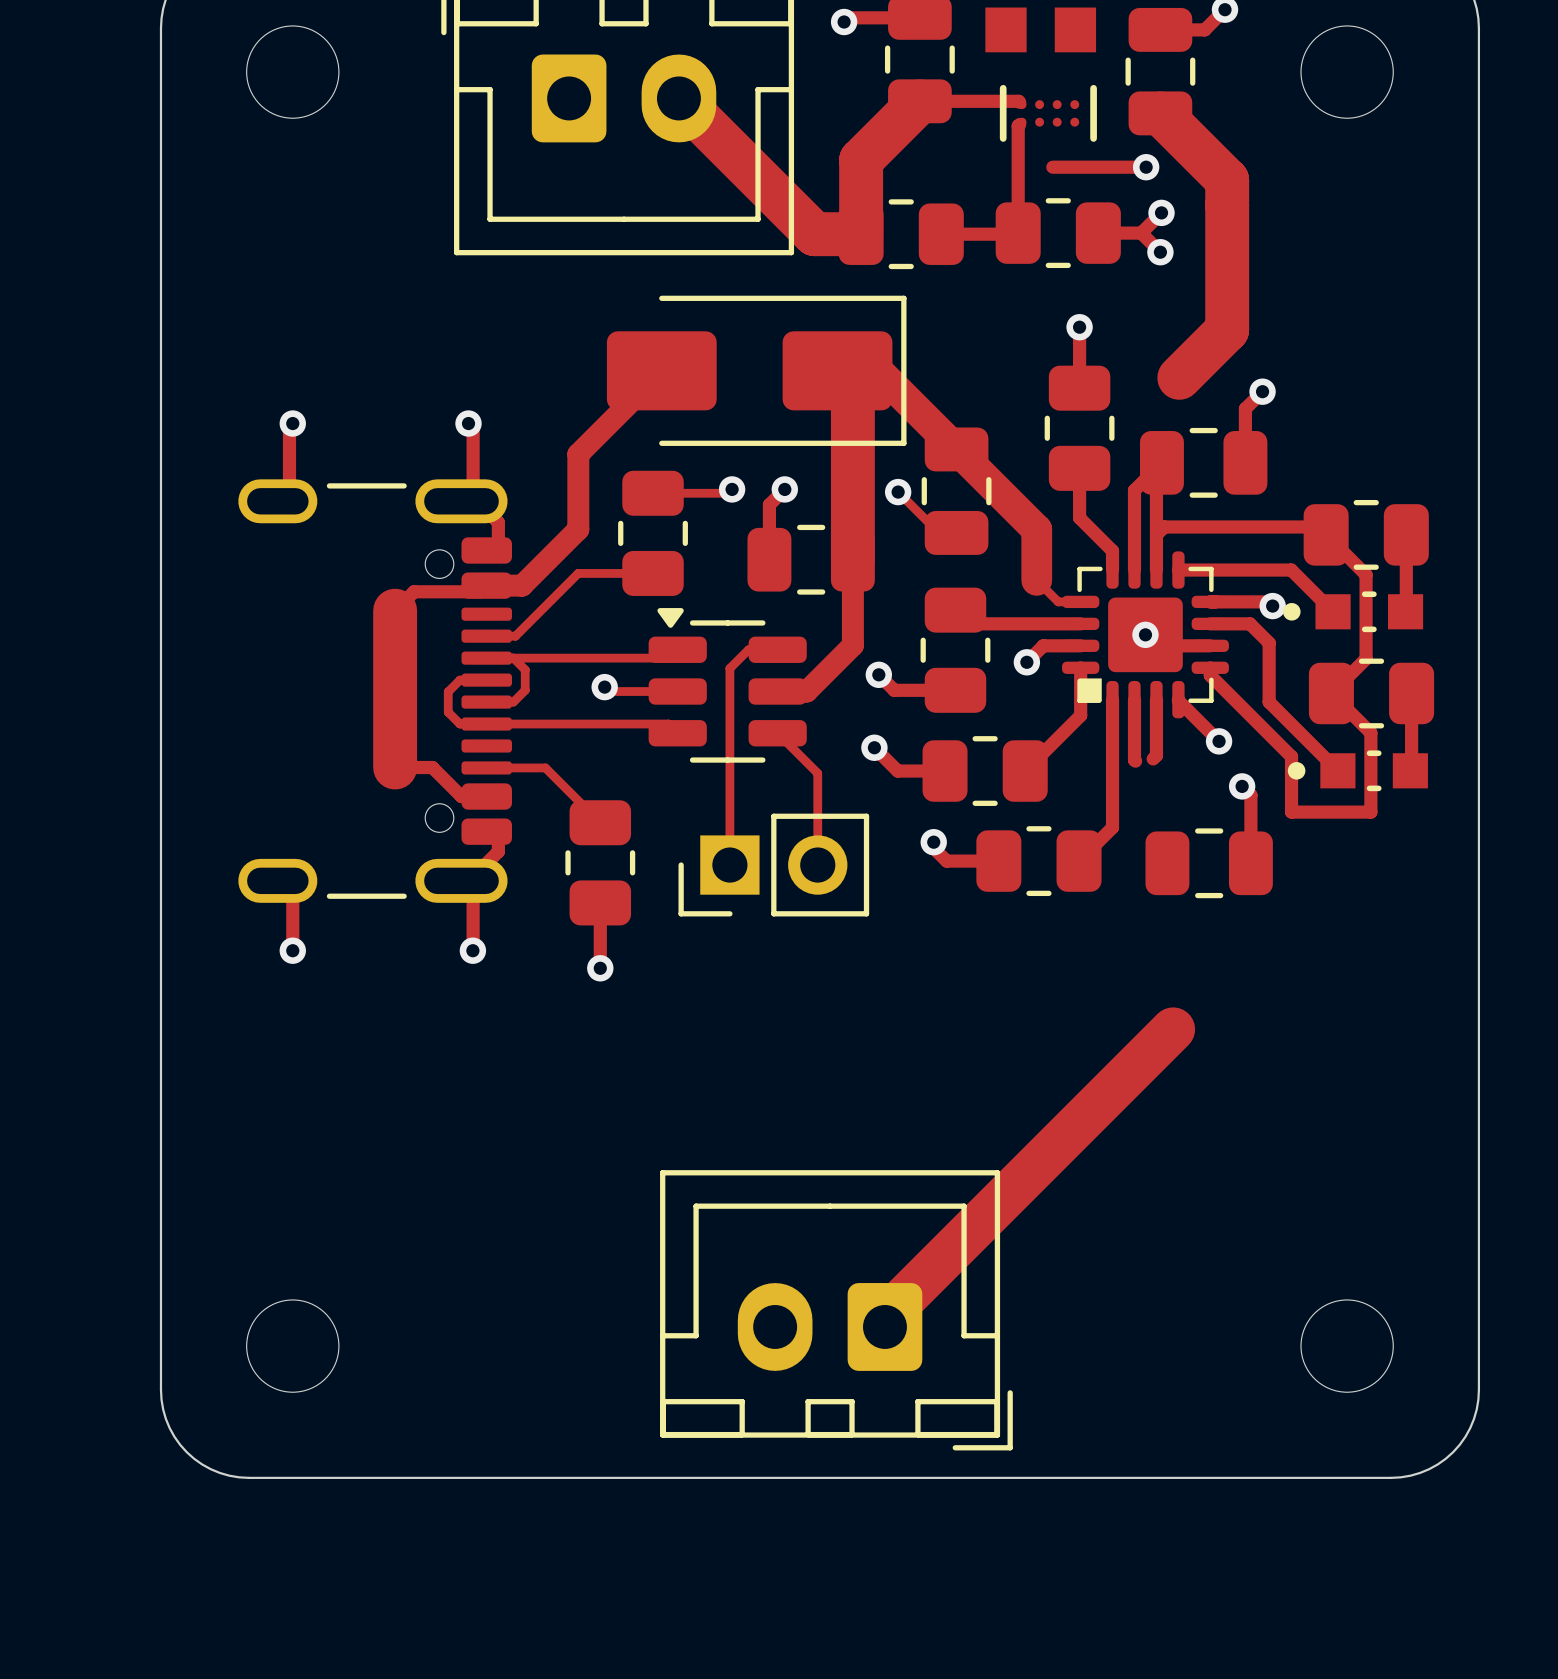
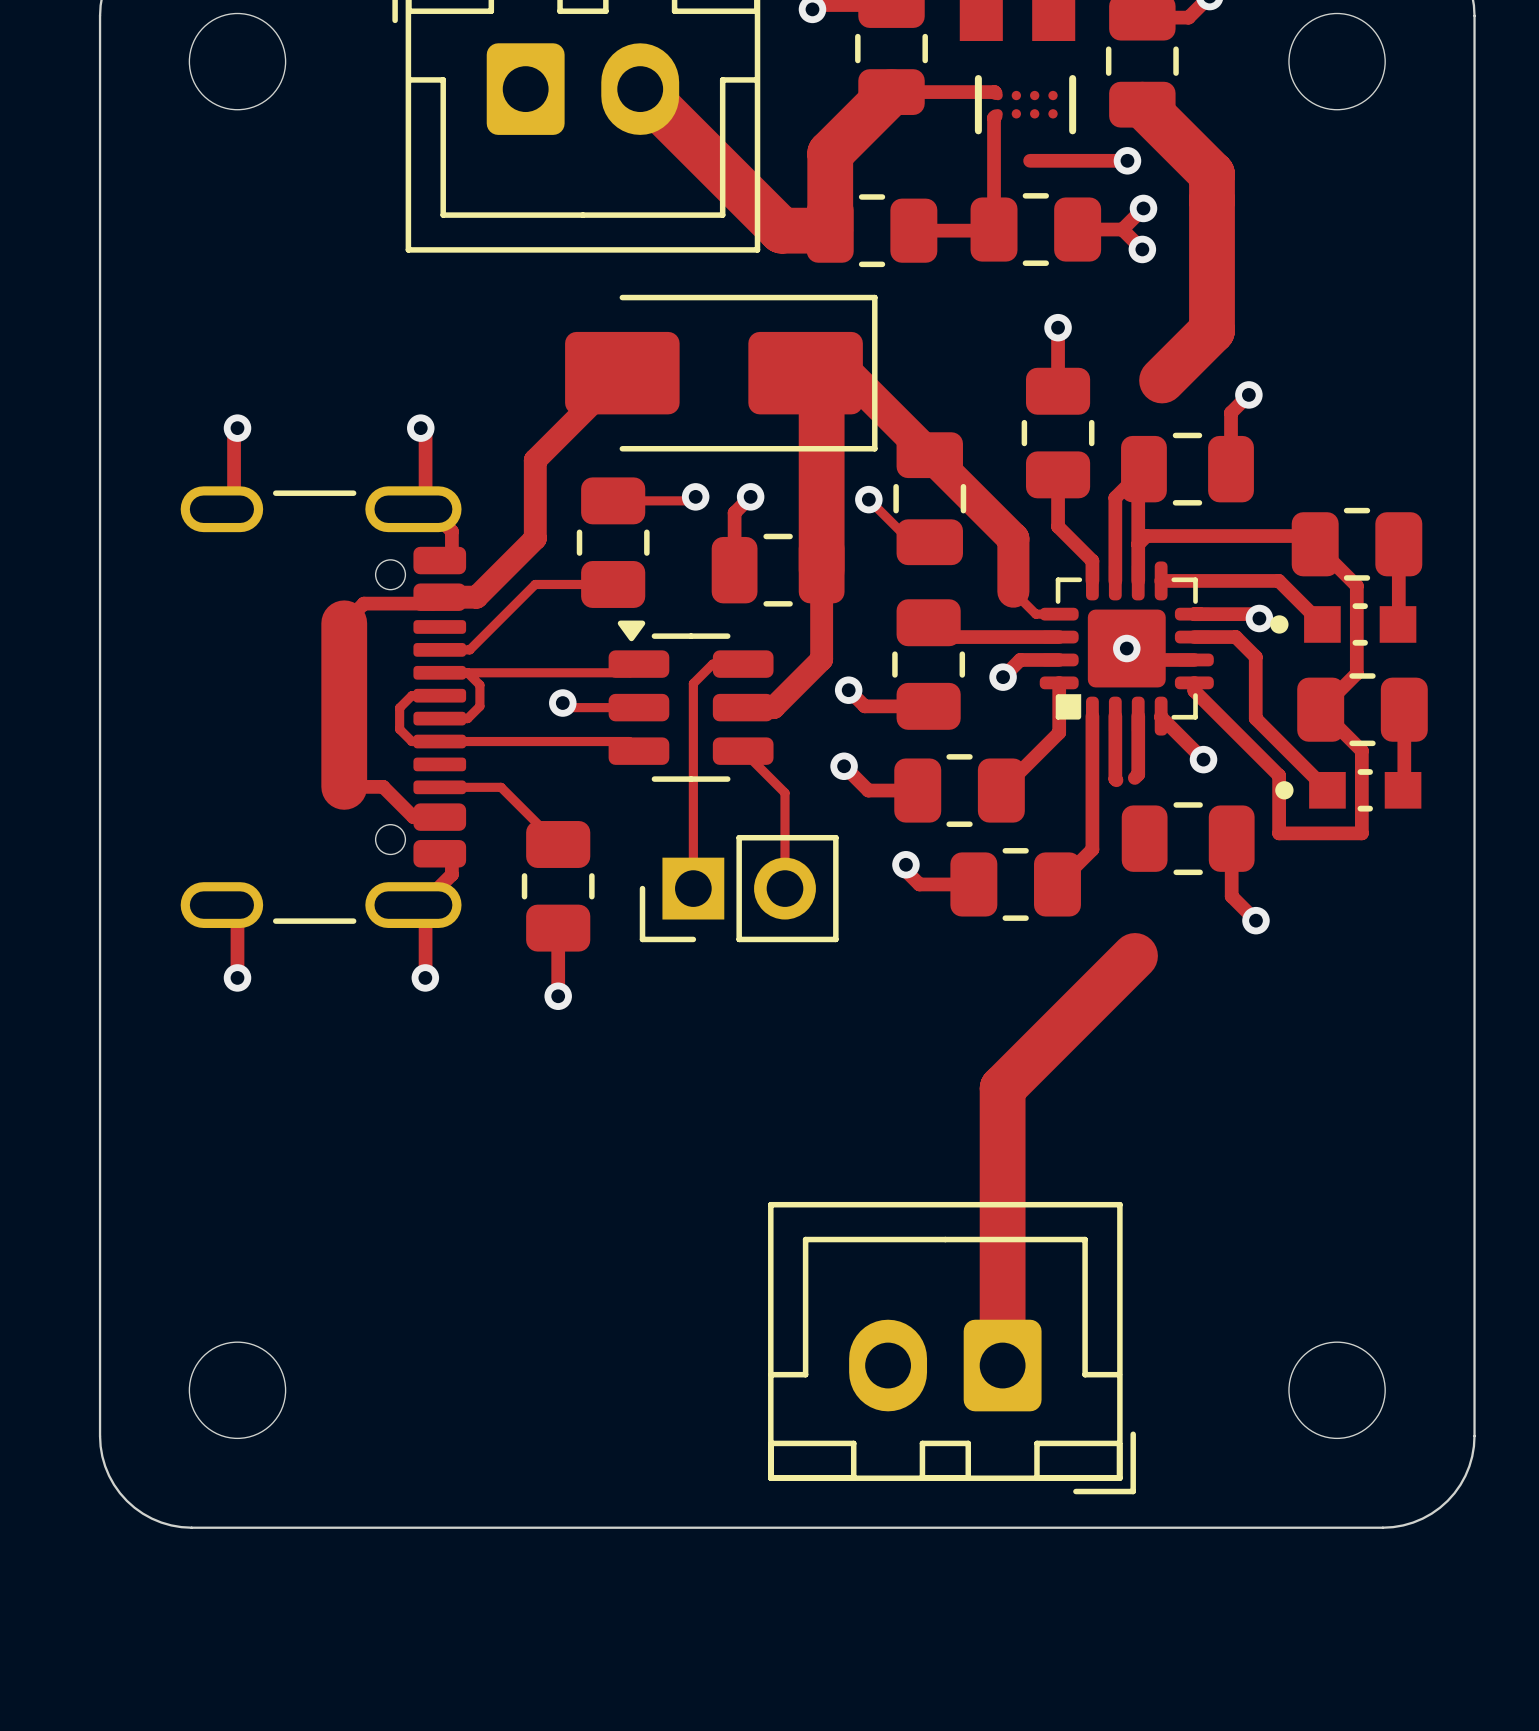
top track: (1242, 786) (1250, 795) (1250, 863) -> none
via position: (1242, 786) -> (1255, 920)
top track: none -> (1231, 838) (1231, 896) (1255, 920)
part position: (1209, 863) -> (1188, 838)
top track: none -> (1135, 955) (1002, 1088) (1002, 1365)
top track: (1173, 1029) (884, 1317) (884, 1326) -> none
part position: (836, 1310) -> (951, 1348)

